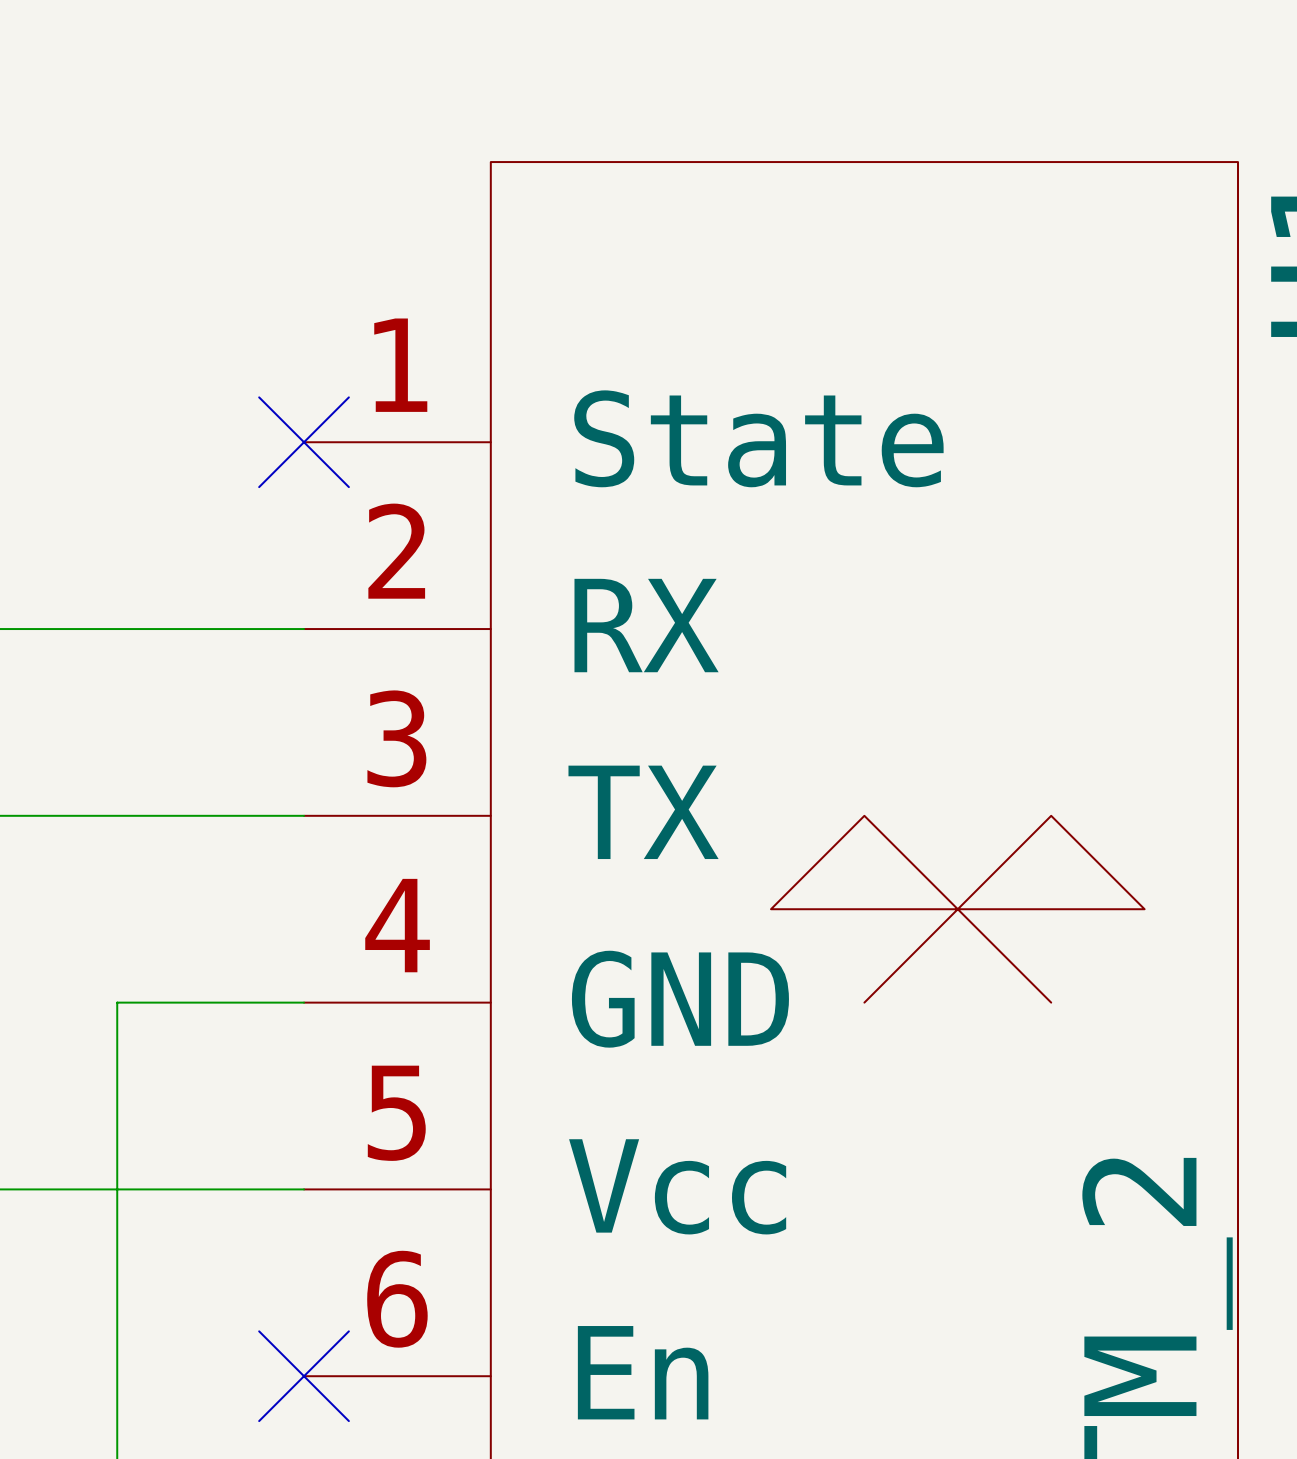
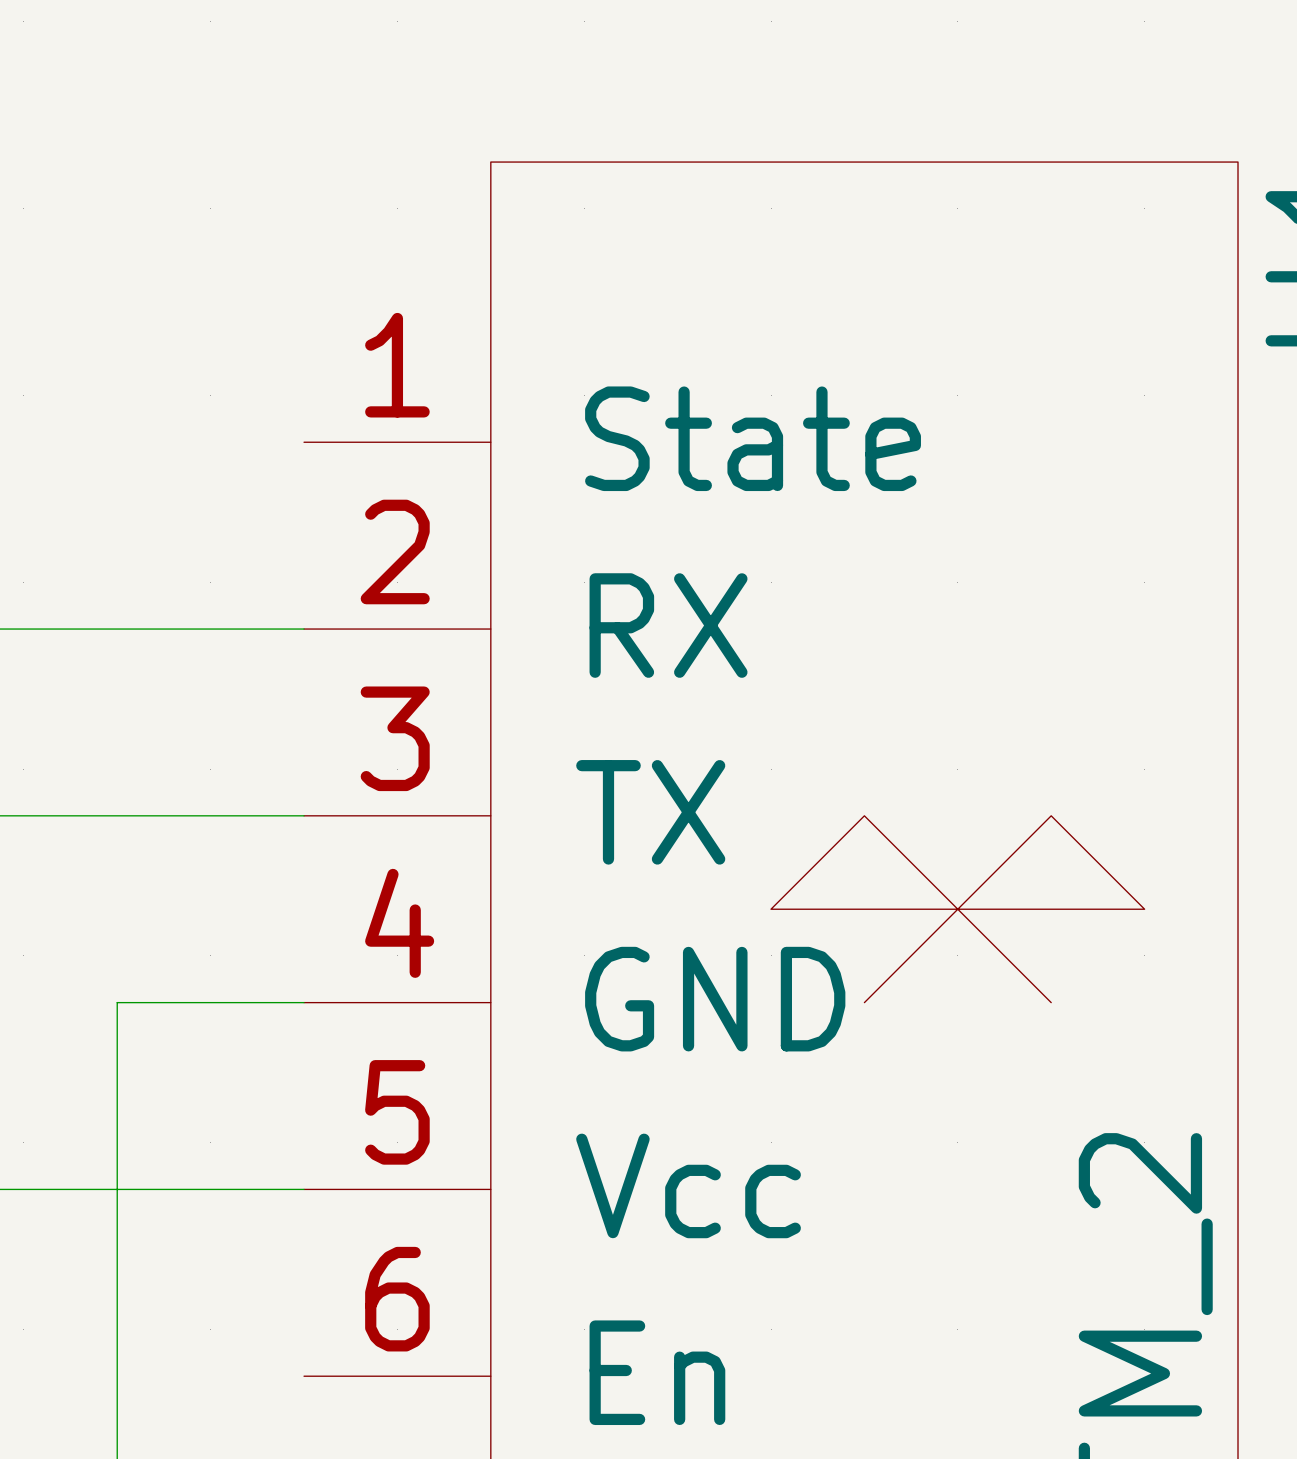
no-connect mark: (304, 442) -> none
no-connect mark: (304, 1376) -> none

